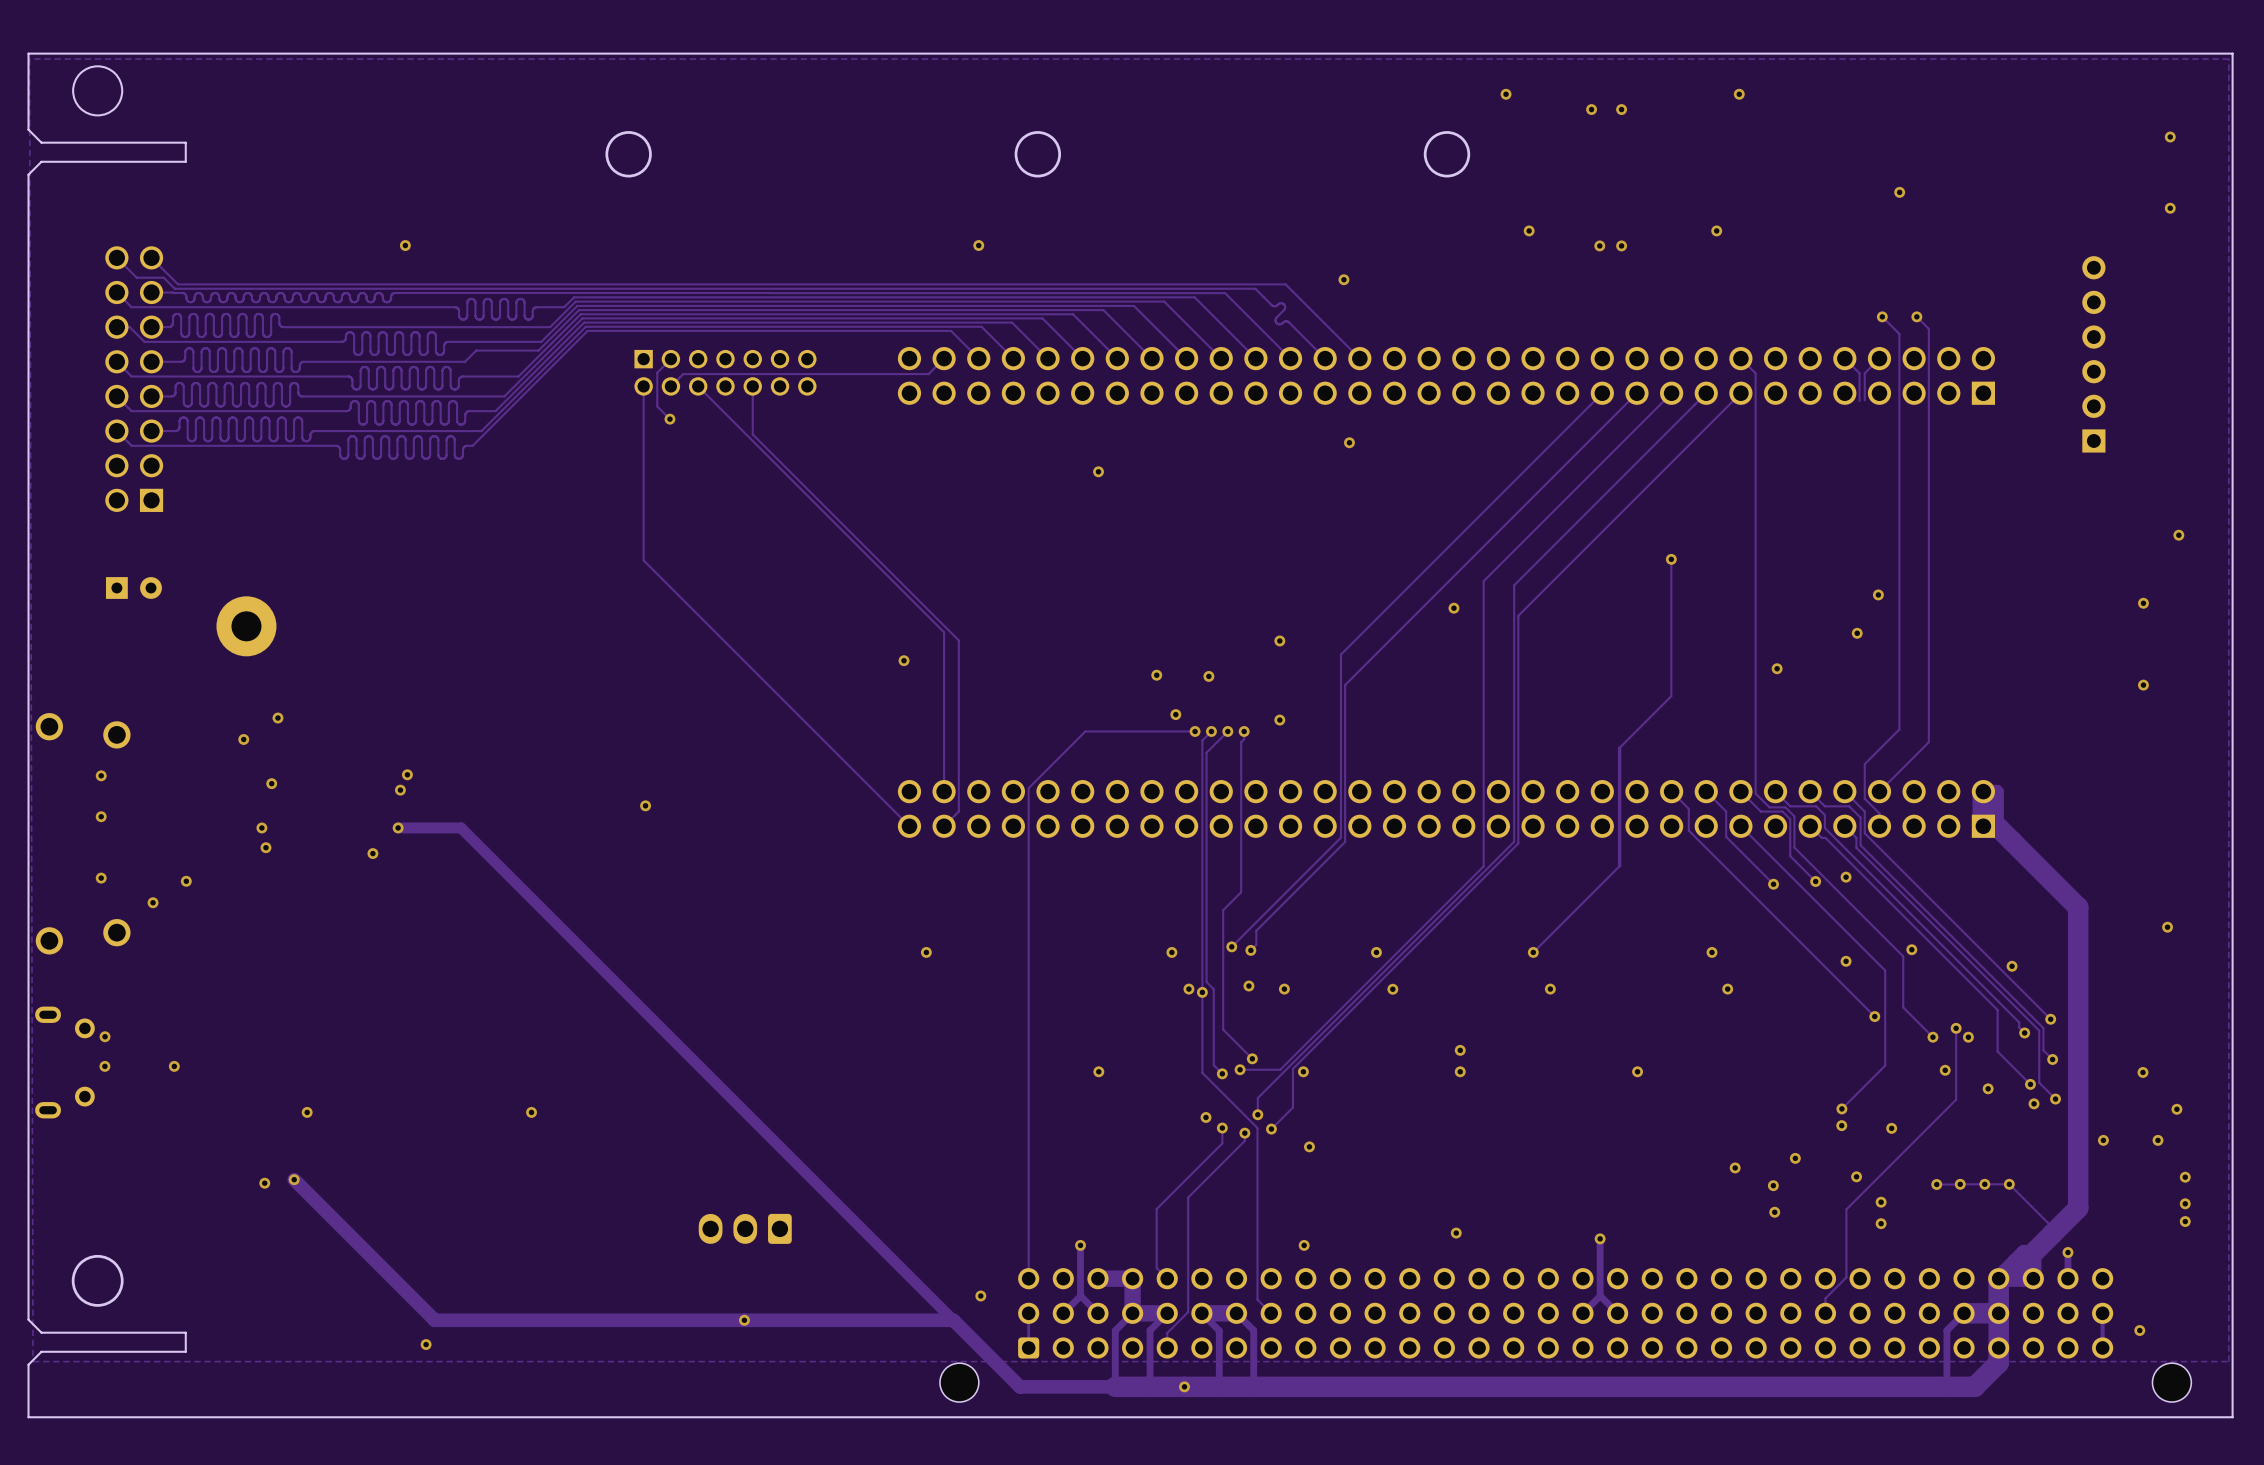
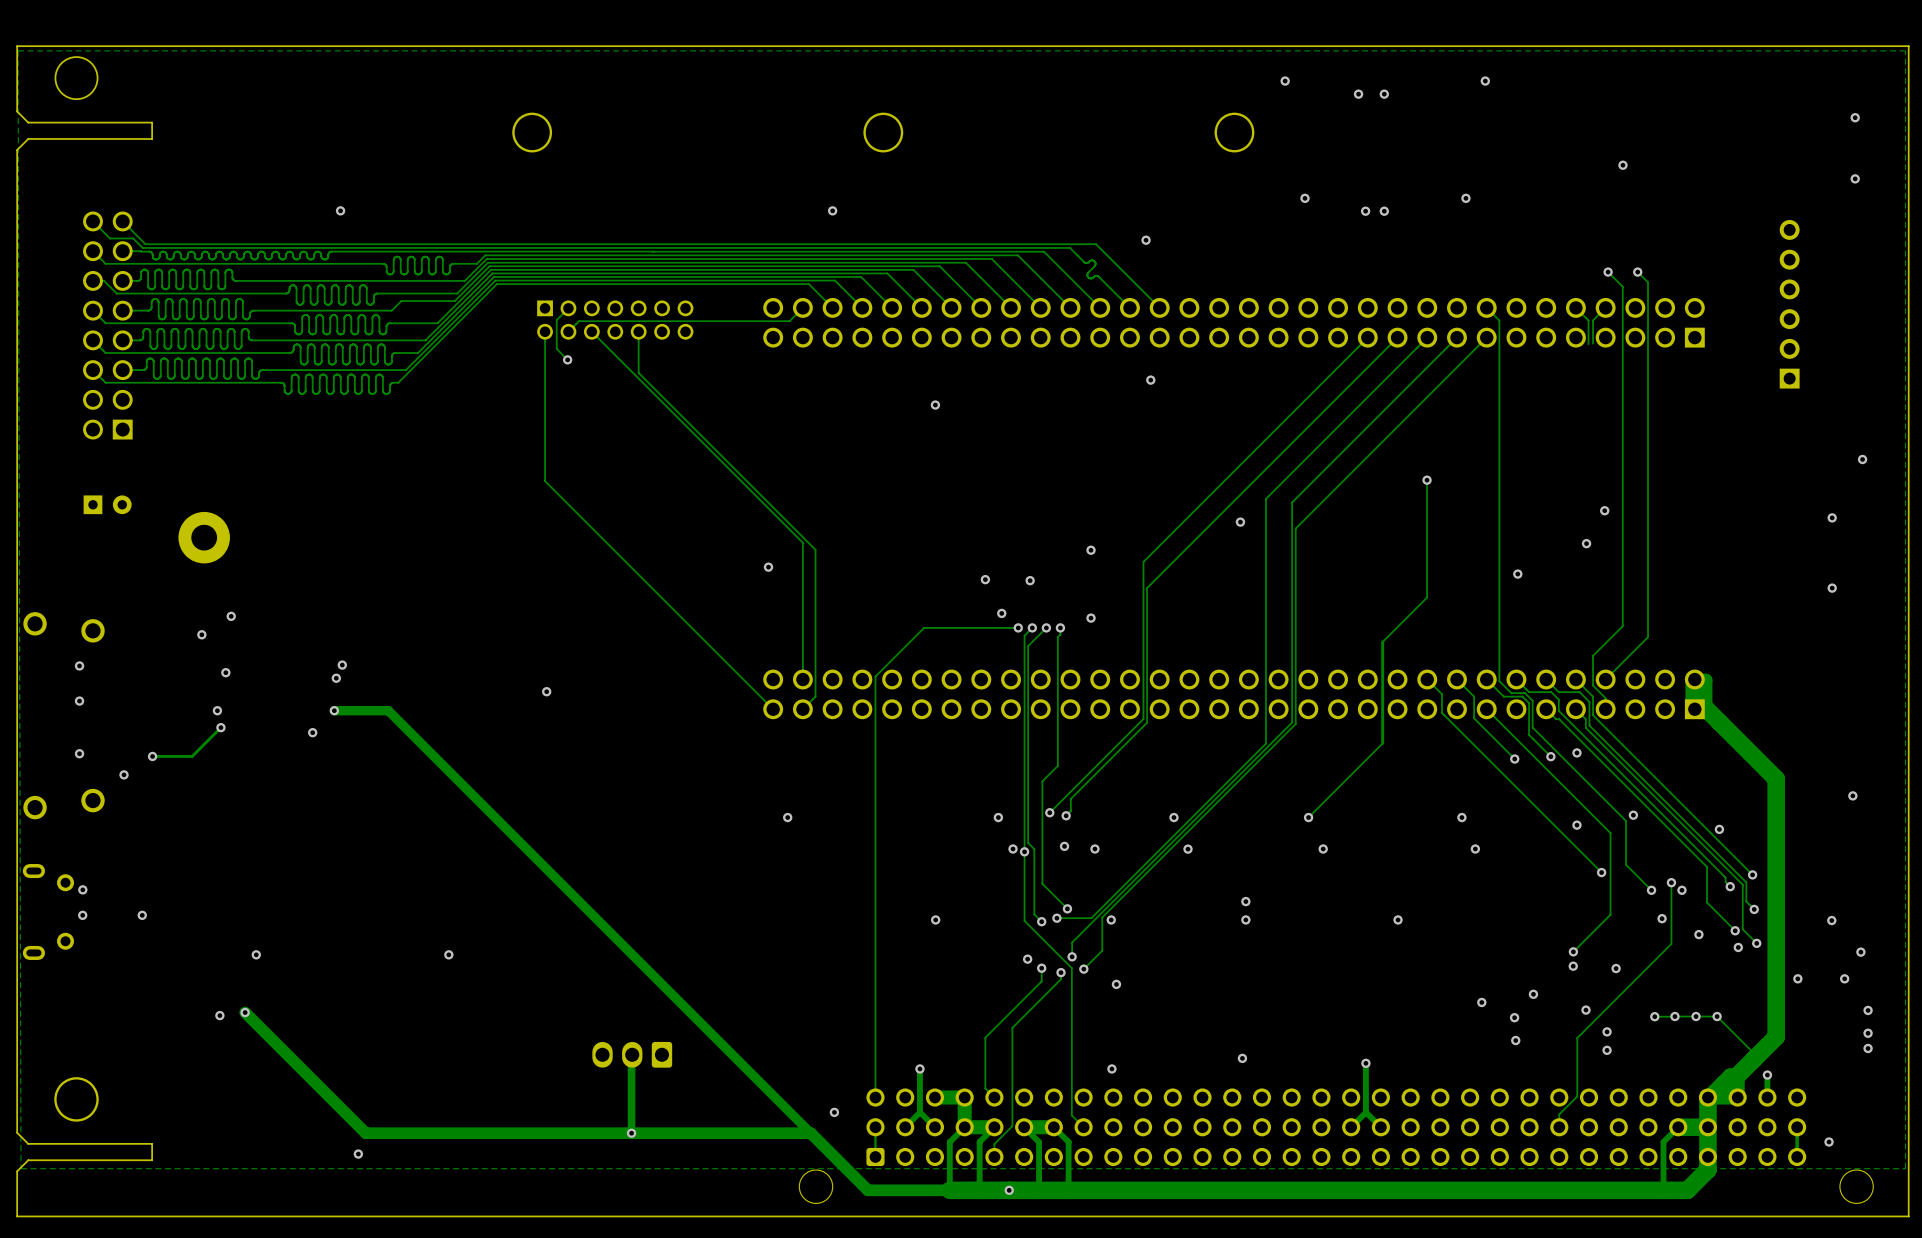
track: none -> (220, 727) (192, 756) (152, 756)
track: none -> (632, 1054) (631, 1133)

